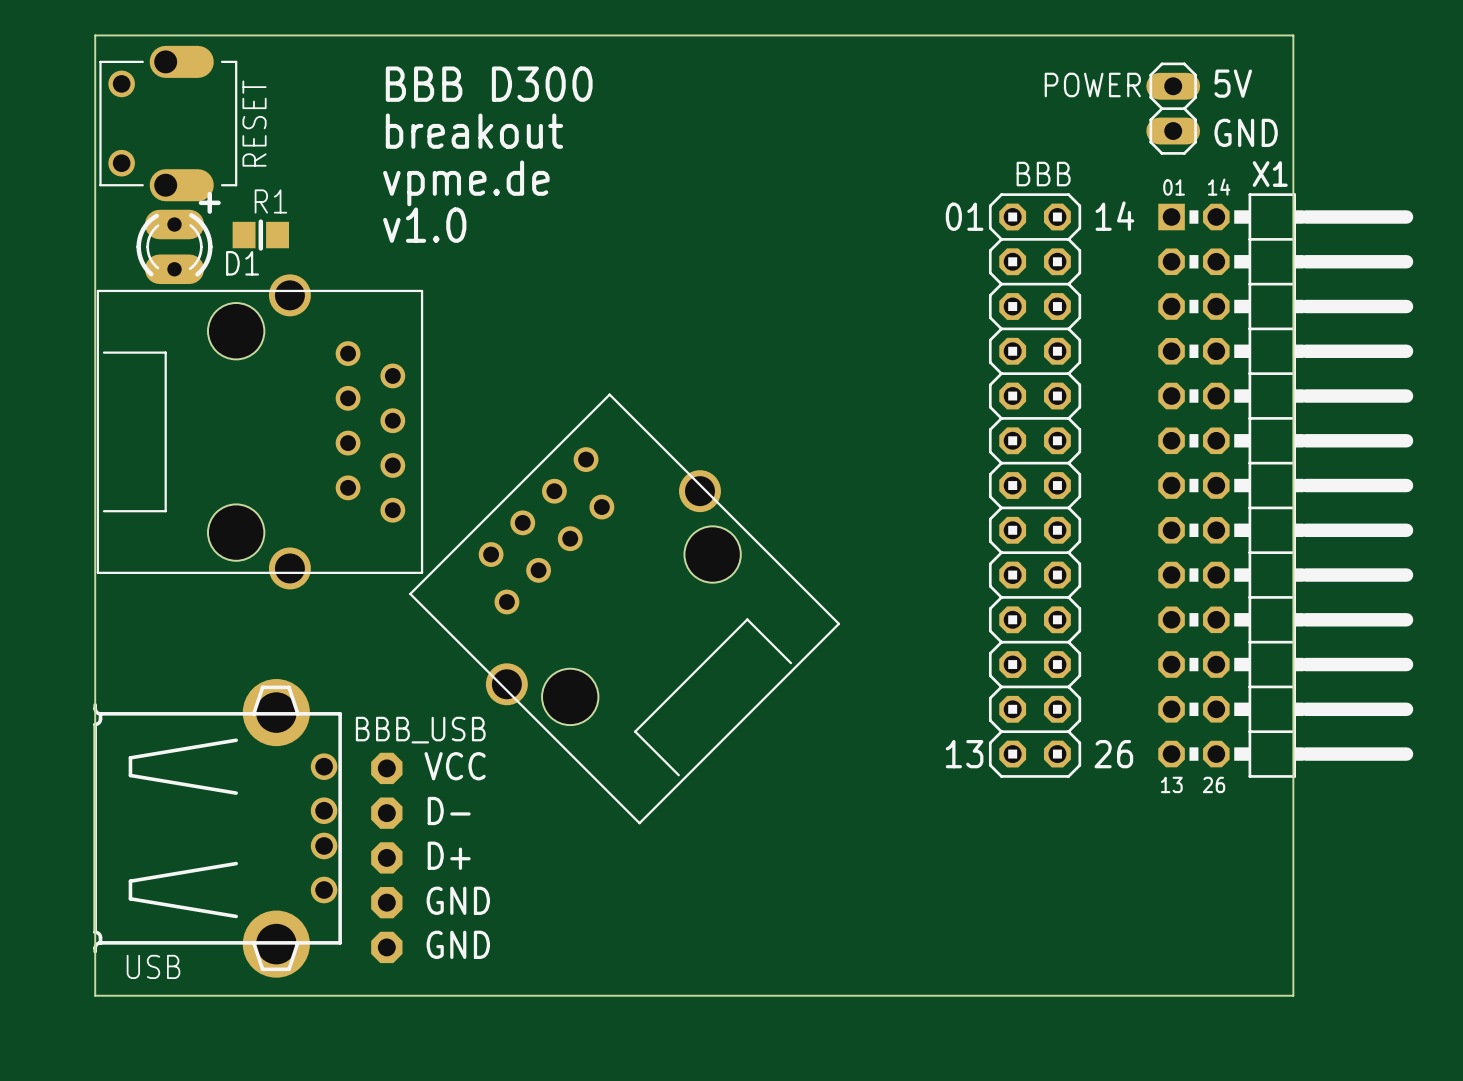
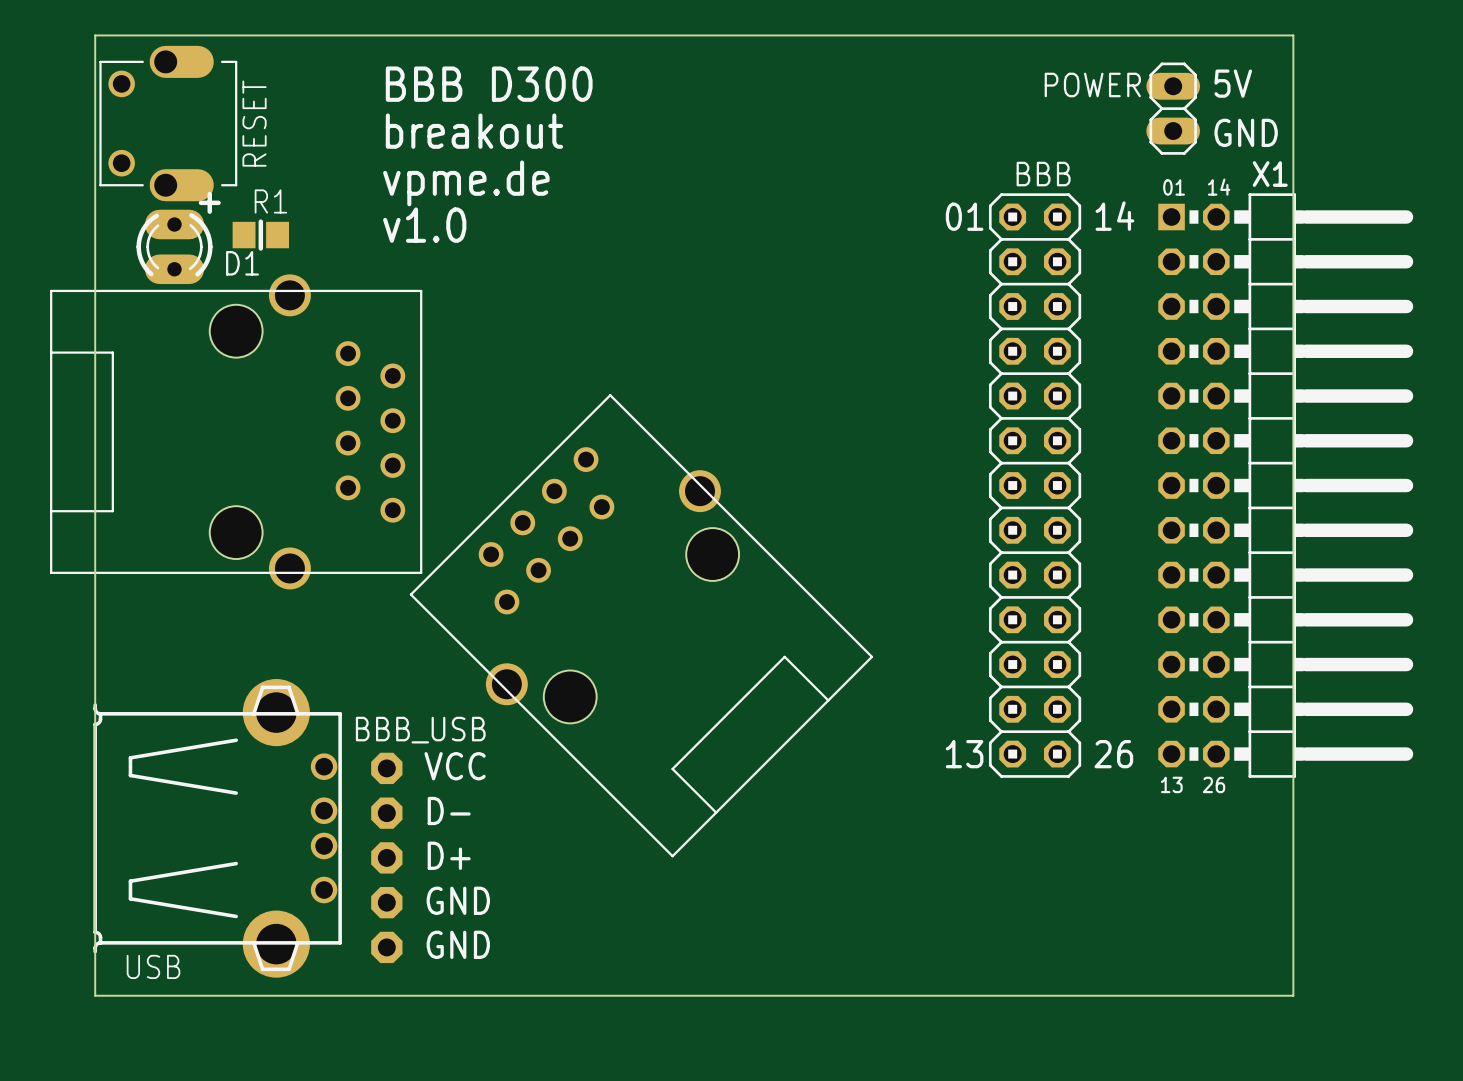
part: none -> (236, 431)
part: (259, 431) -> none
part: (624, 608) -> none
part: none -> (641, 625)

